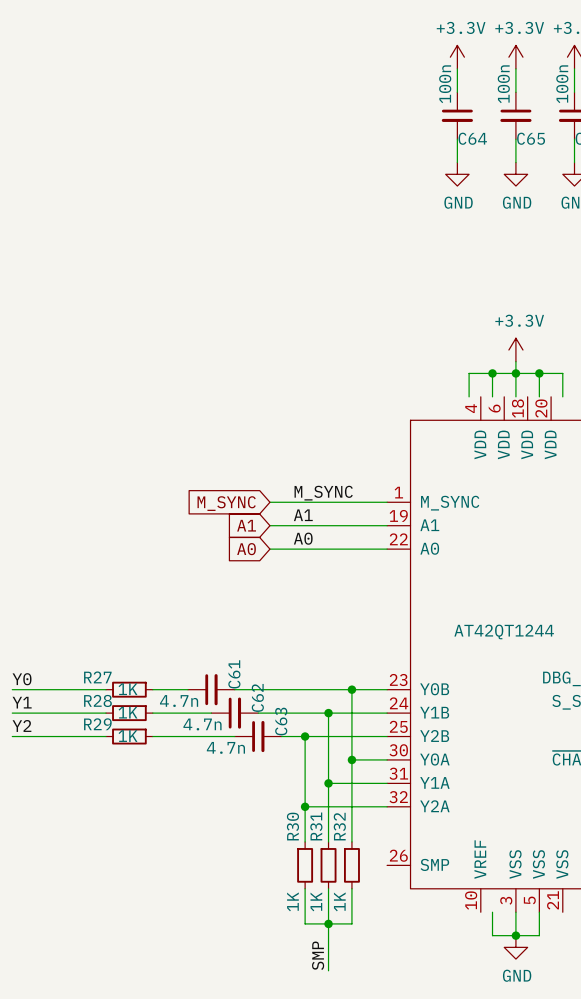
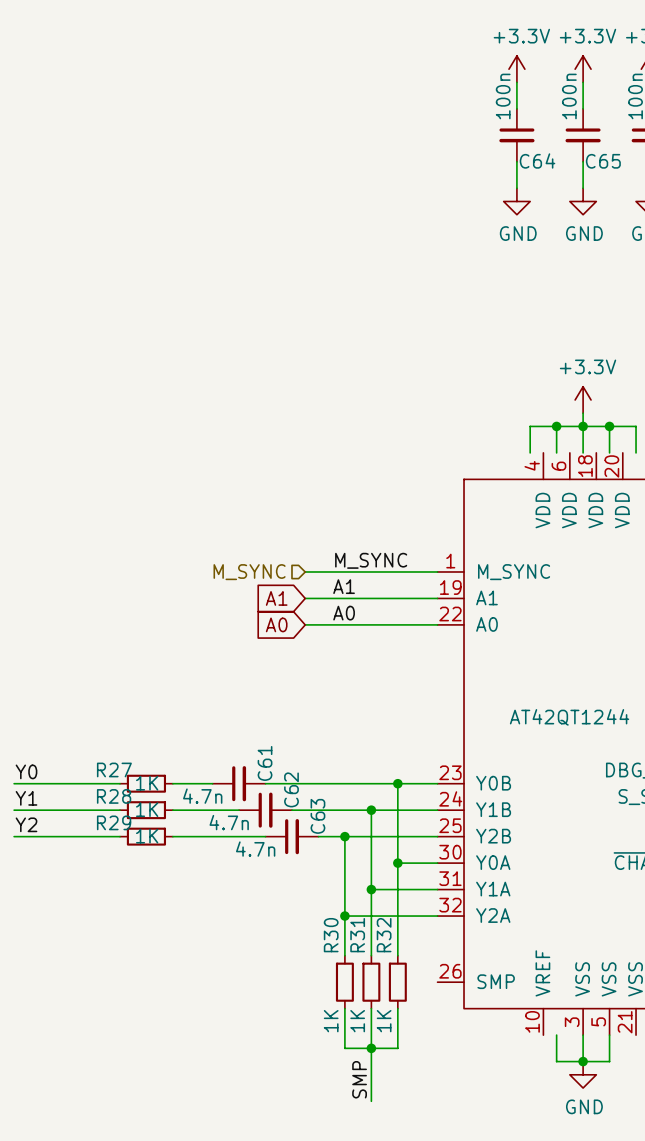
hierarchical label: none -> M_SYNC (249, 572)
global label: M_SYNC (226, 503) -> none

